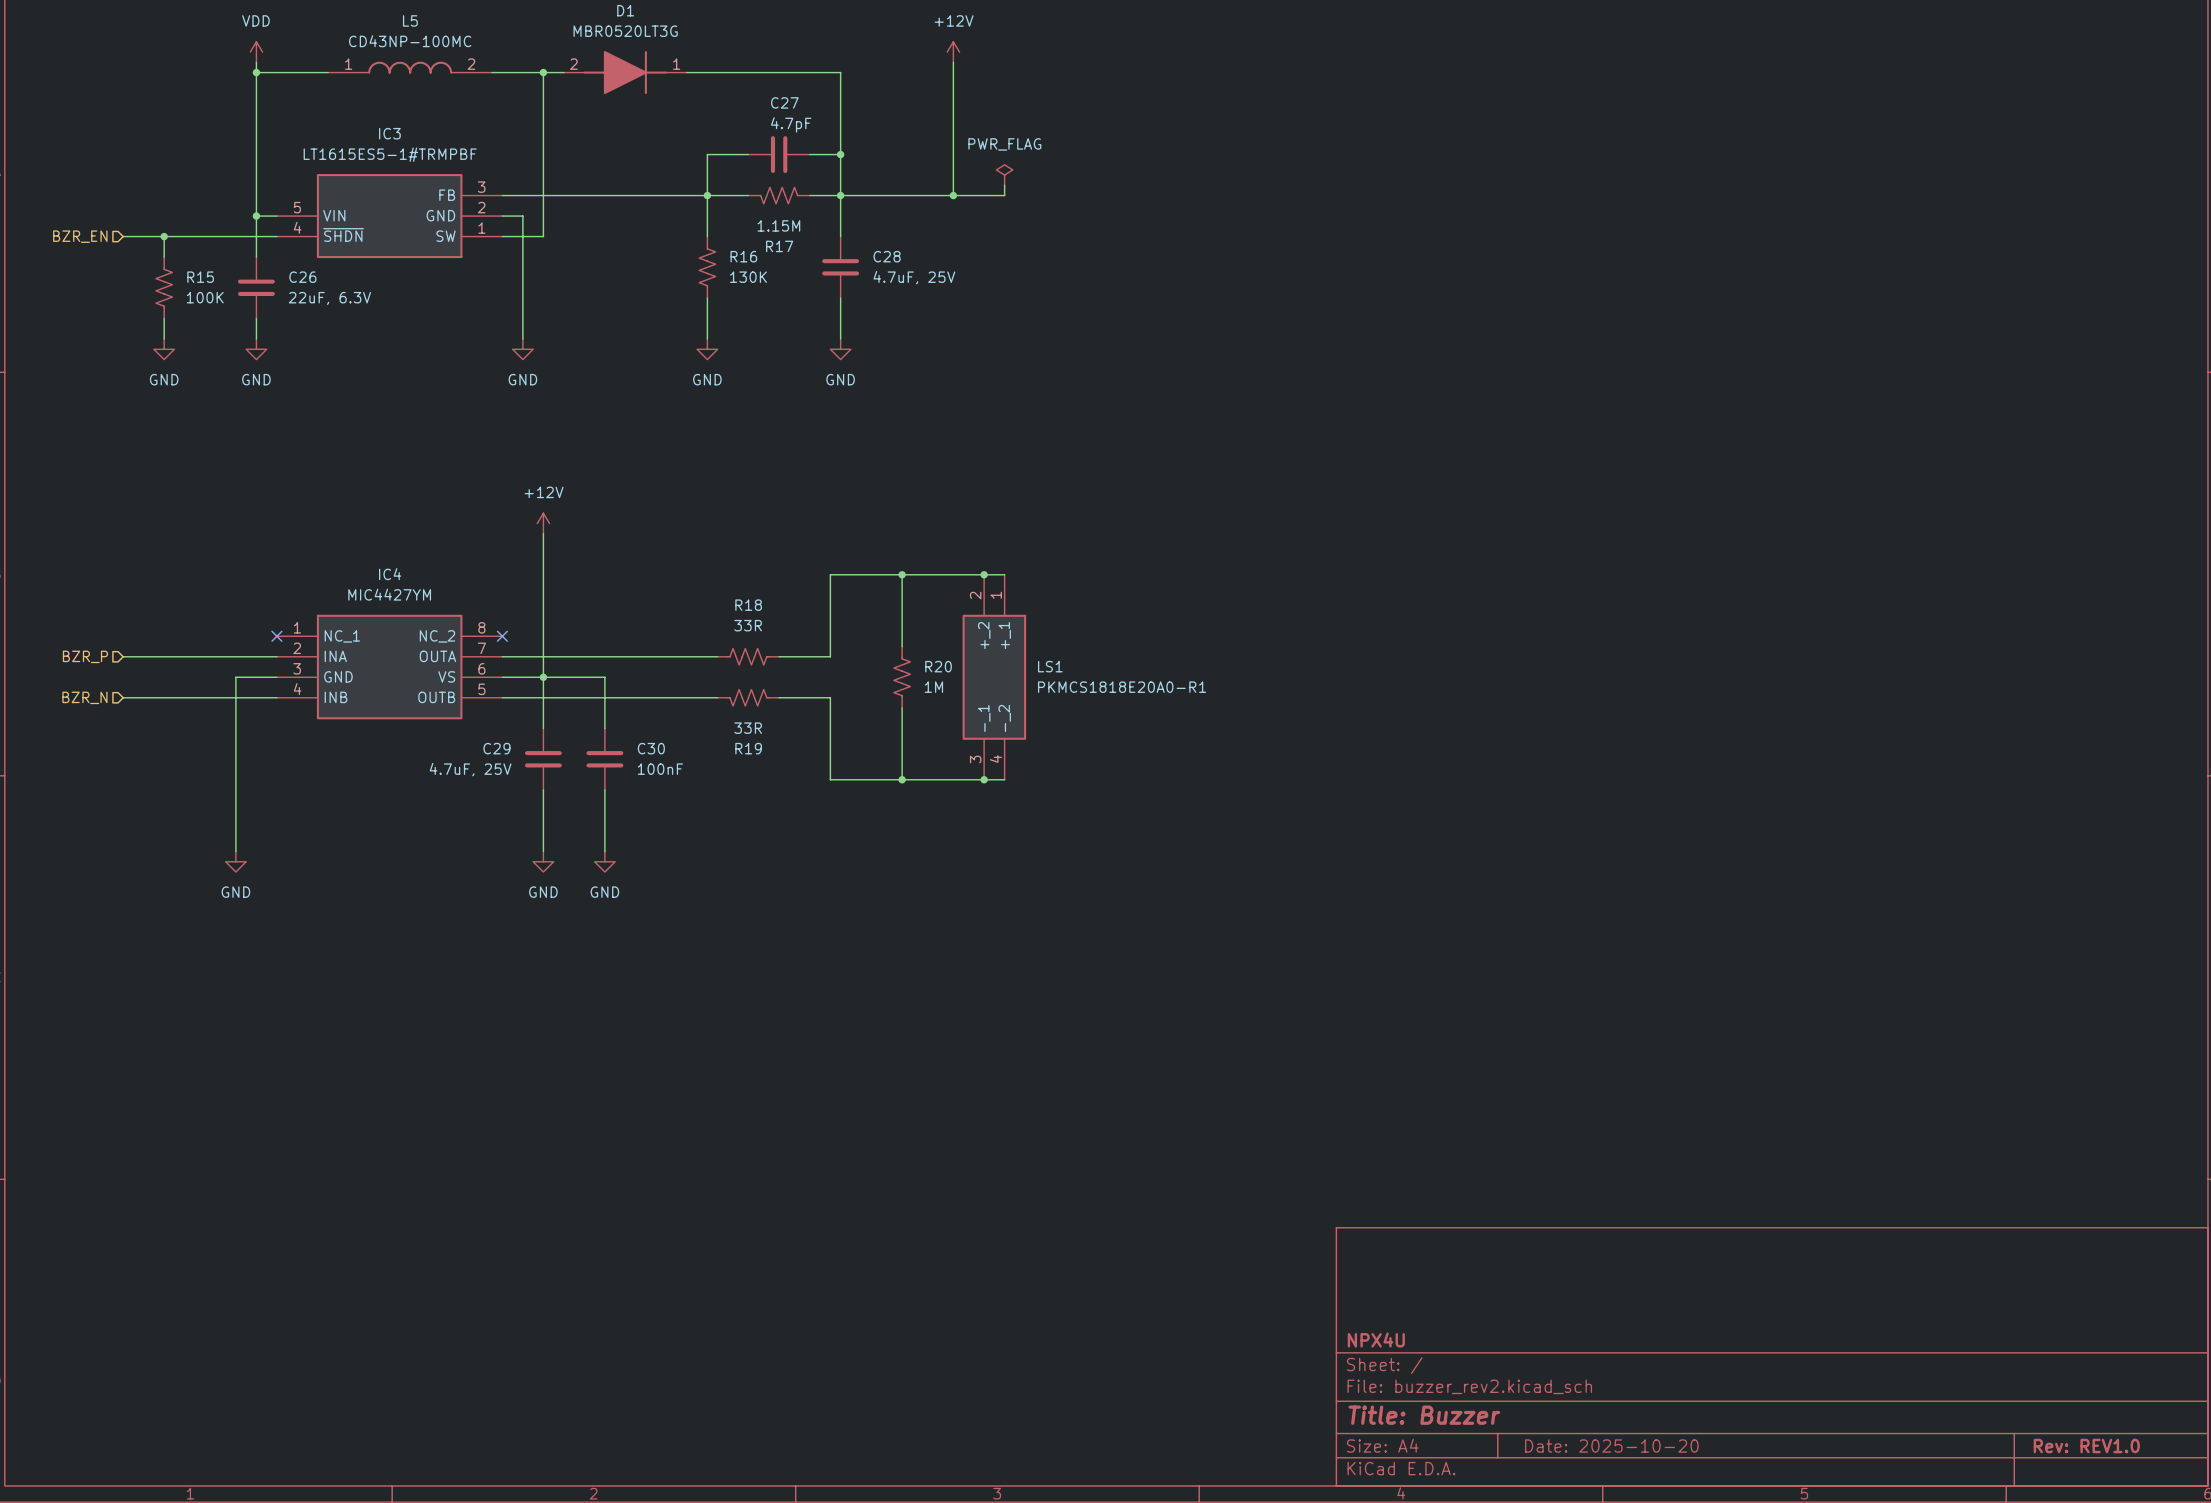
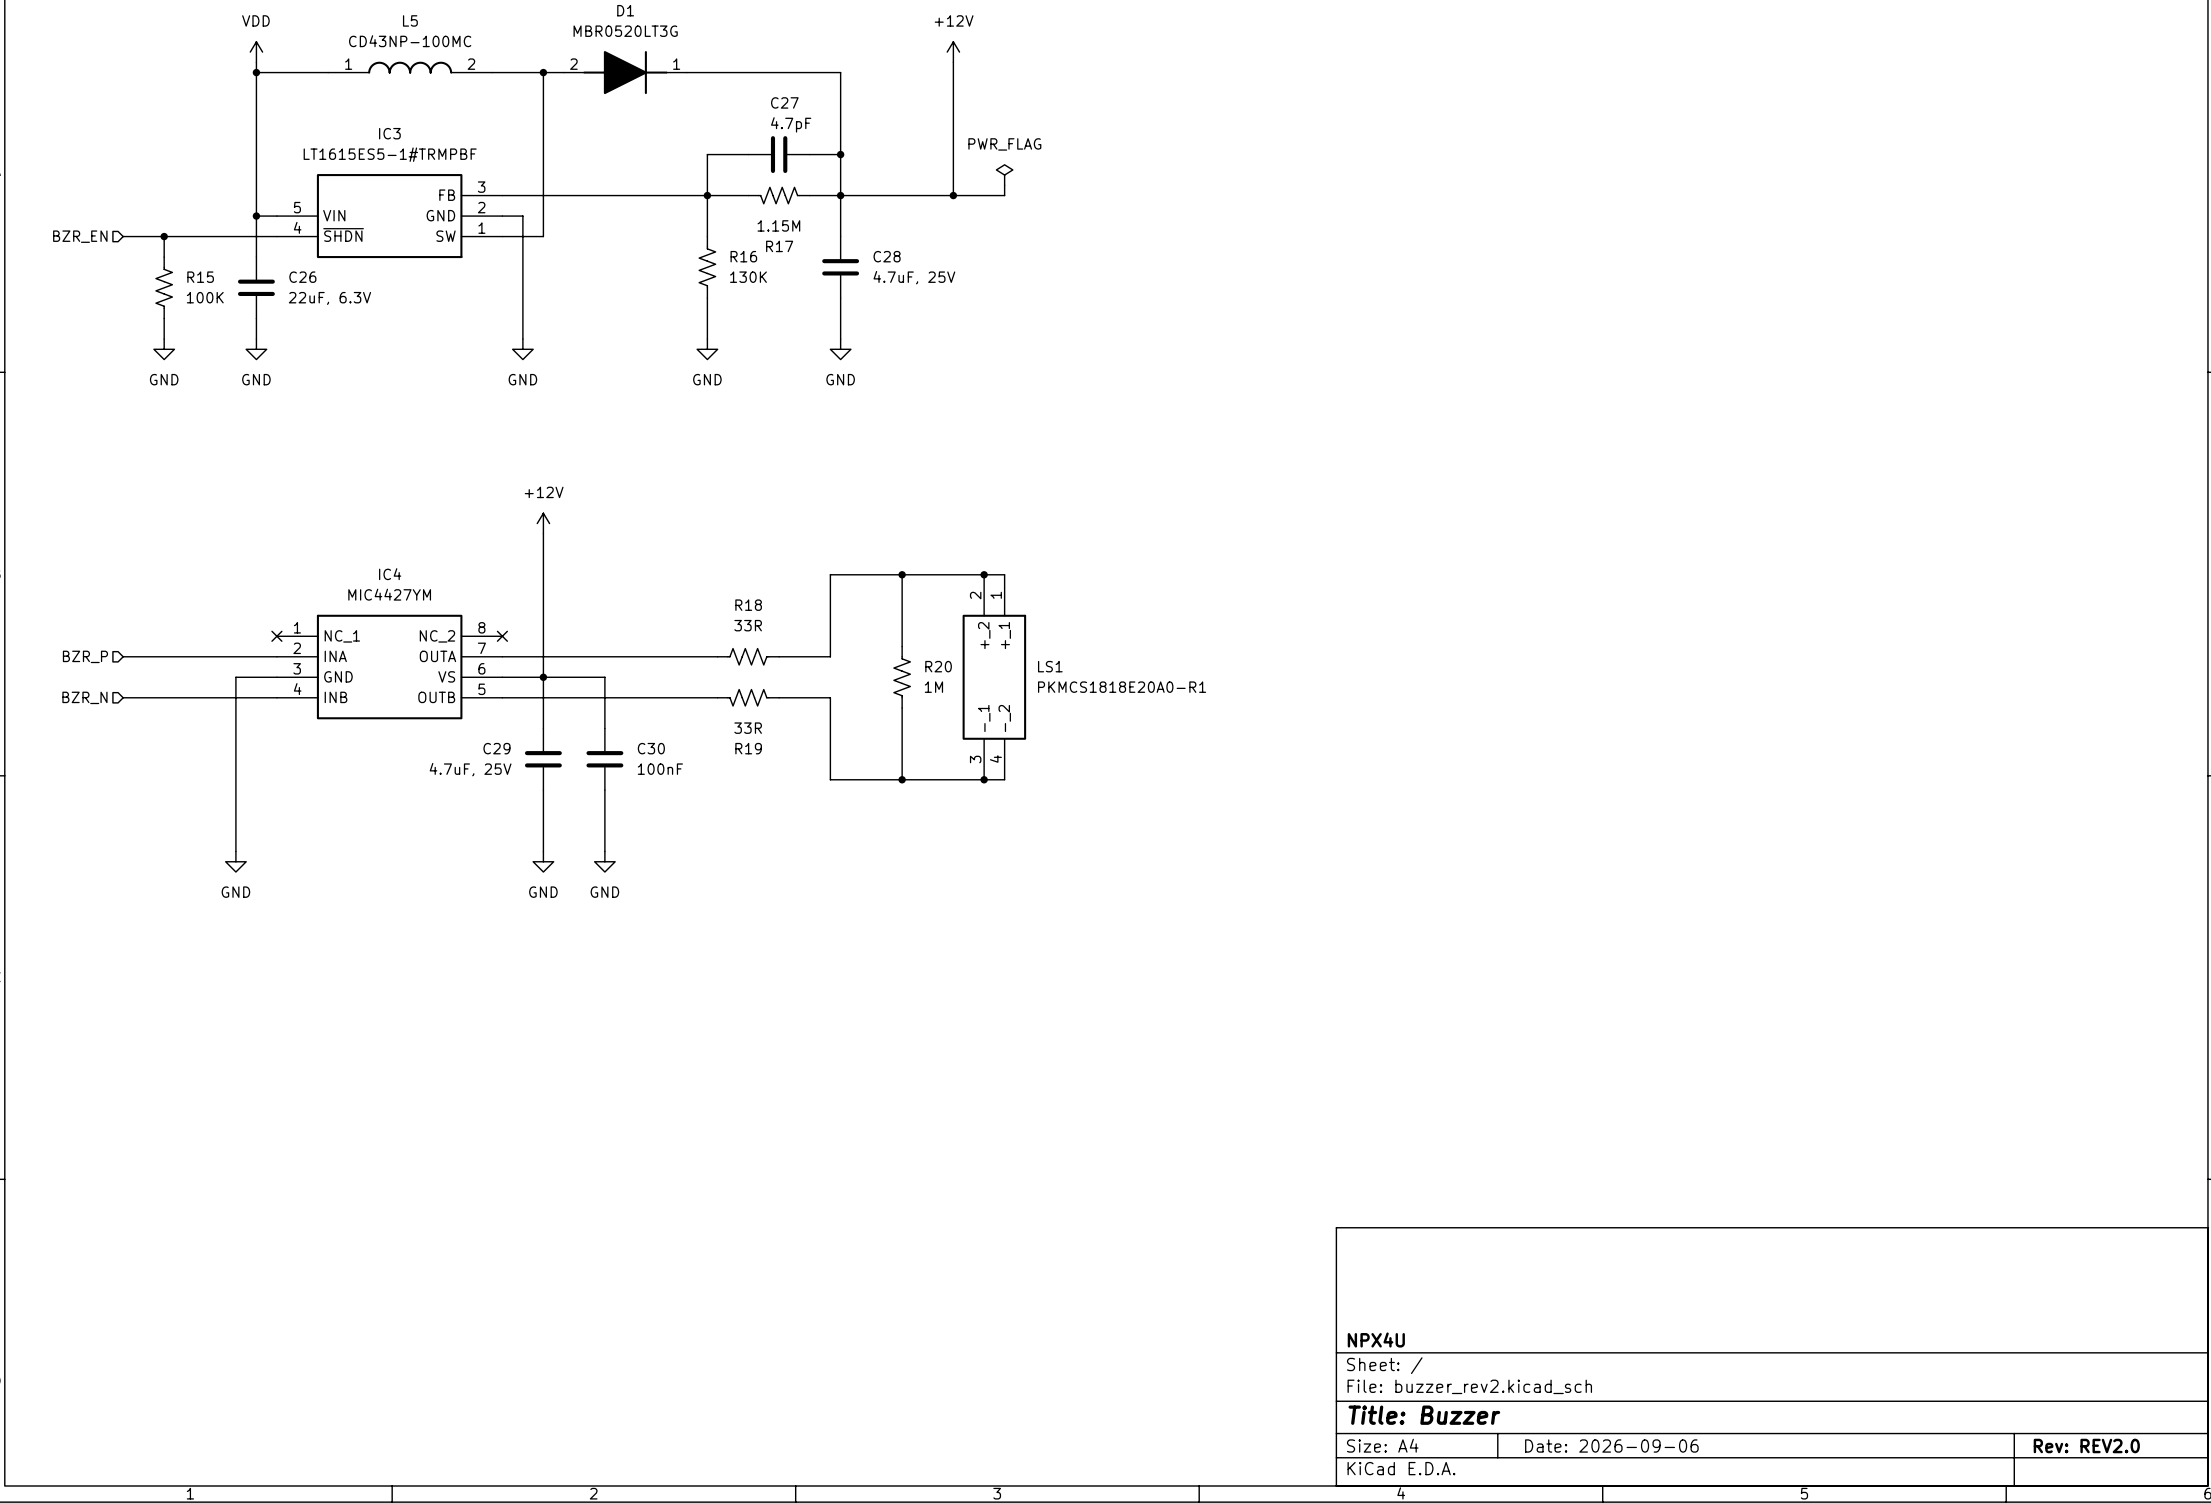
title block: Date: 2025-10-20 (1611, 1446) -> Date: 2026-09-06 (1611, 1446)
title block: Rev: REV1.0 (2086, 1446) -> Rev: REV2.0 (2086, 1446)

